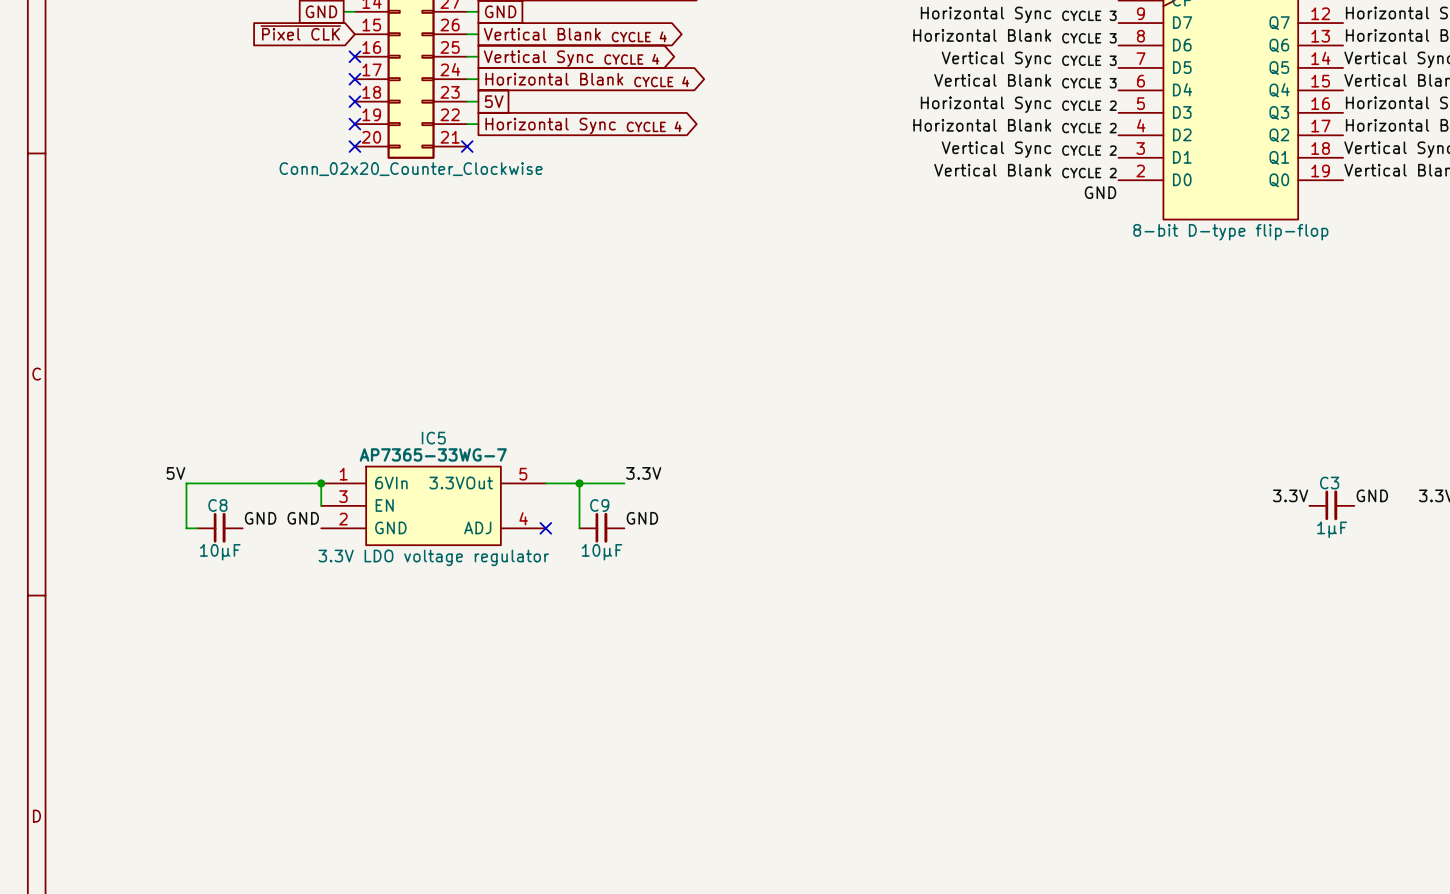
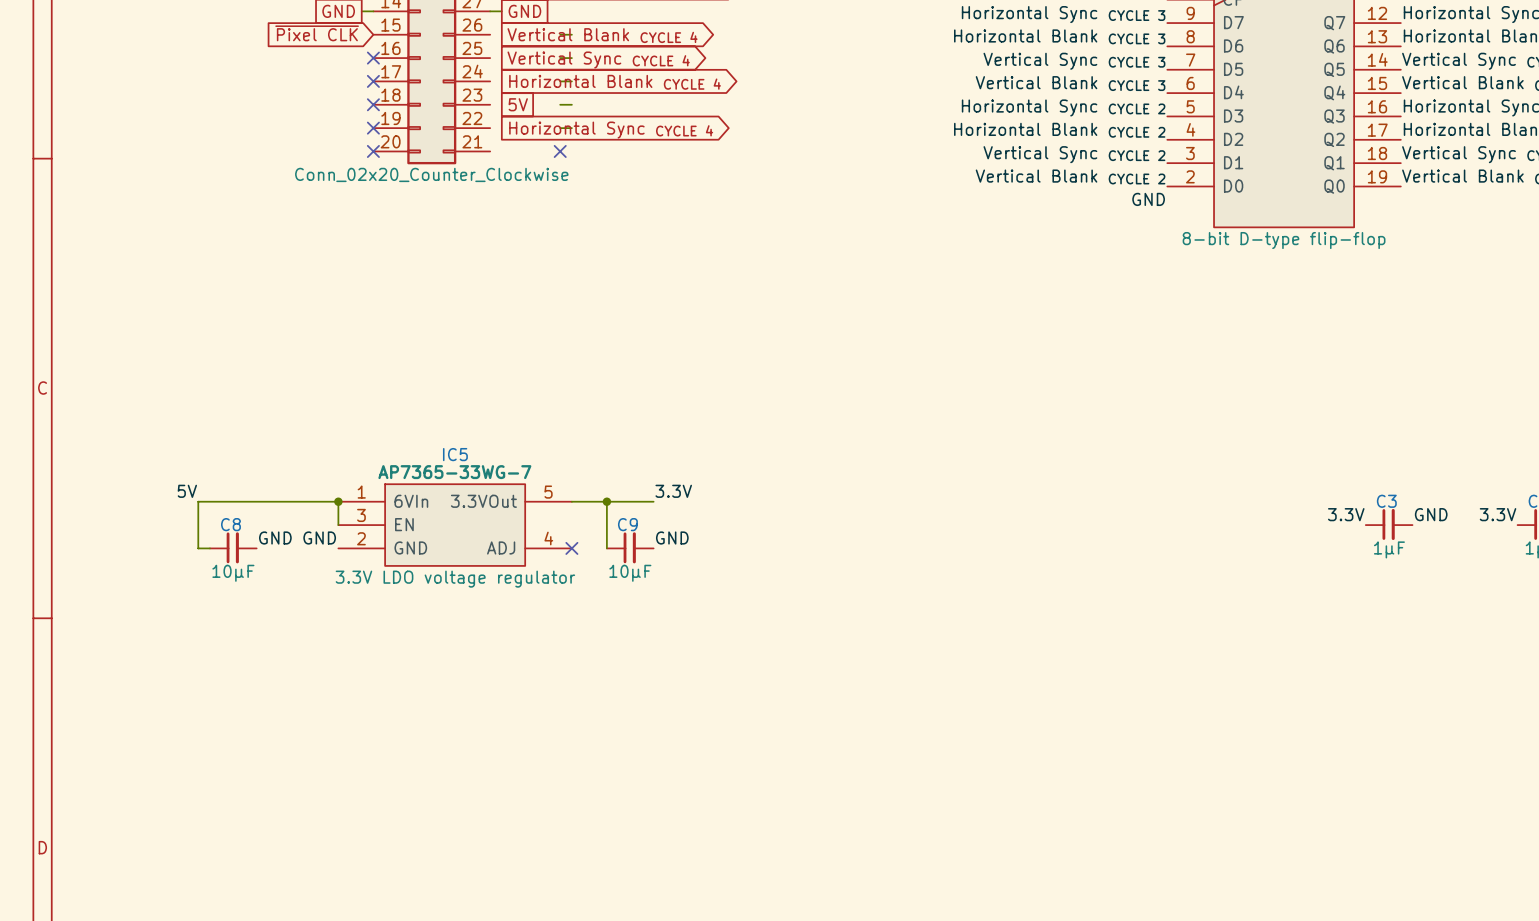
wire: (467, 34) (478, 34) -> (560, 34) (571, 34)
wire: (467, 56) (478, 56) -> (560, 58) (571, 58)
wire: (467, 79) (478, 79) -> (560, 81) (571, 81)
wire: (467, 101) (478, 101) -> (560, 104) (571, 104)
wire: (467, 124) (478, 124) -> (560, 128) (571, 128)
no-connect mark: (467, 146) -> none
no-connect mark: none -> (560, 151)

